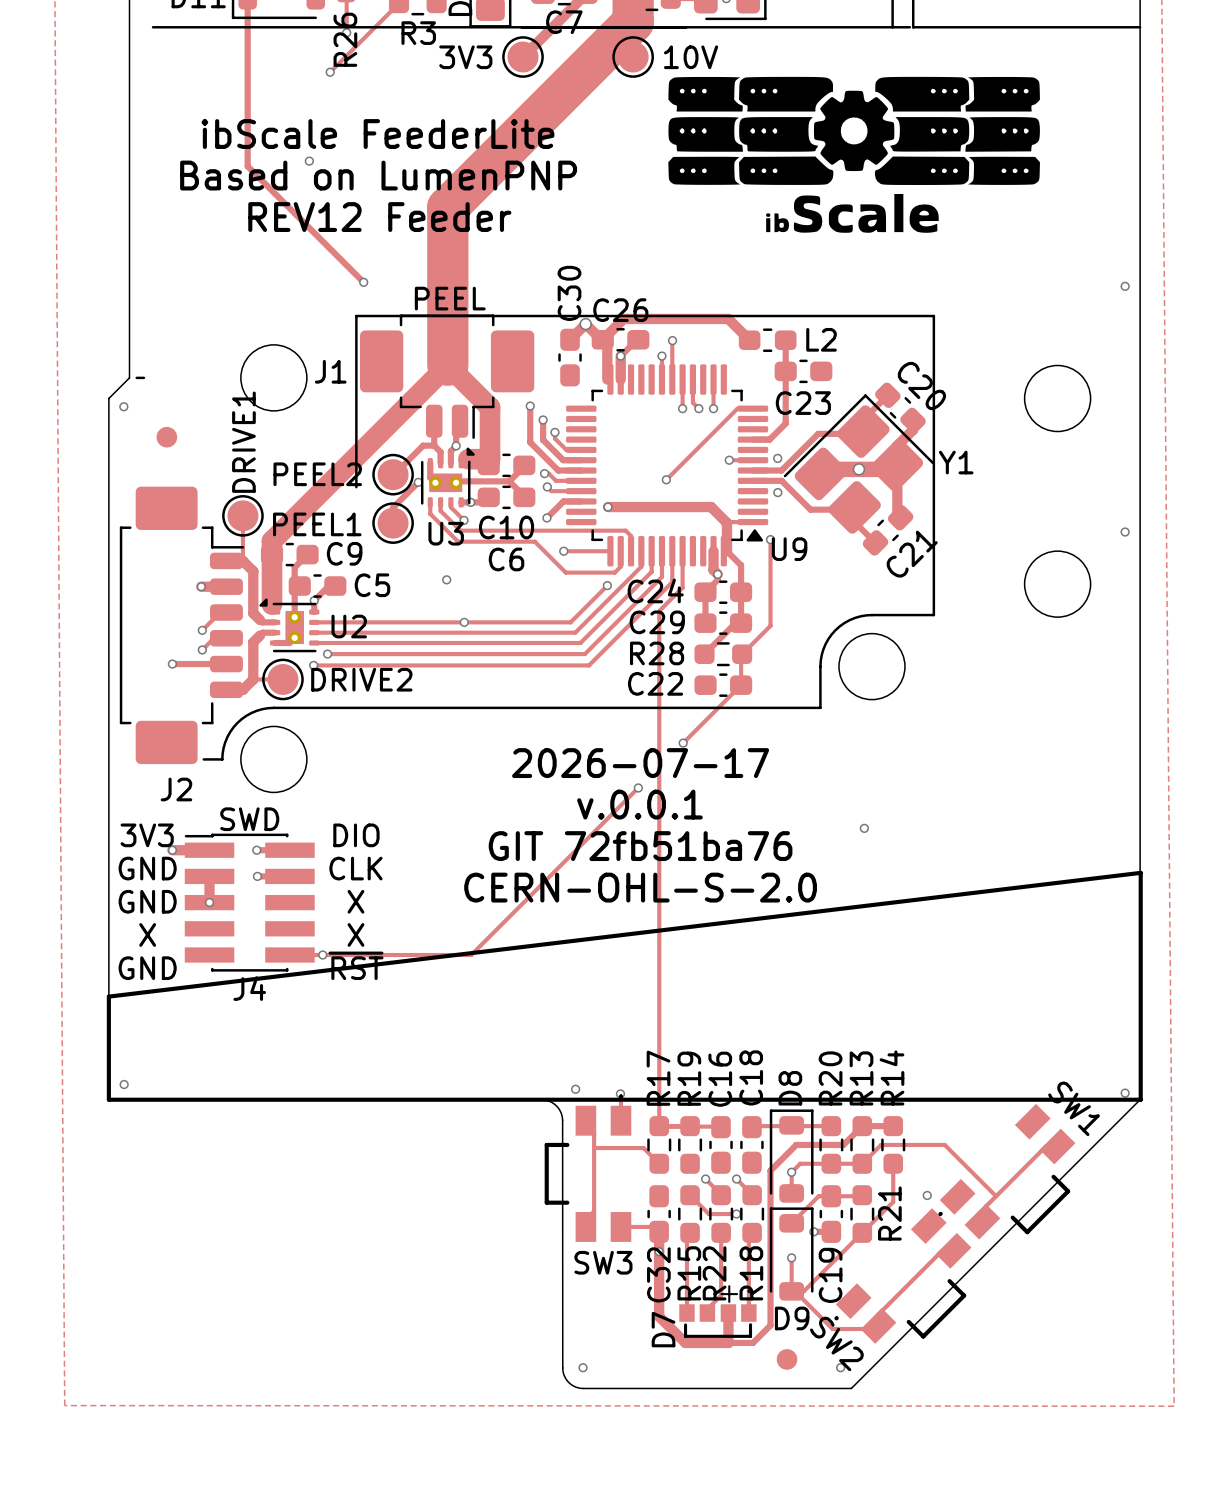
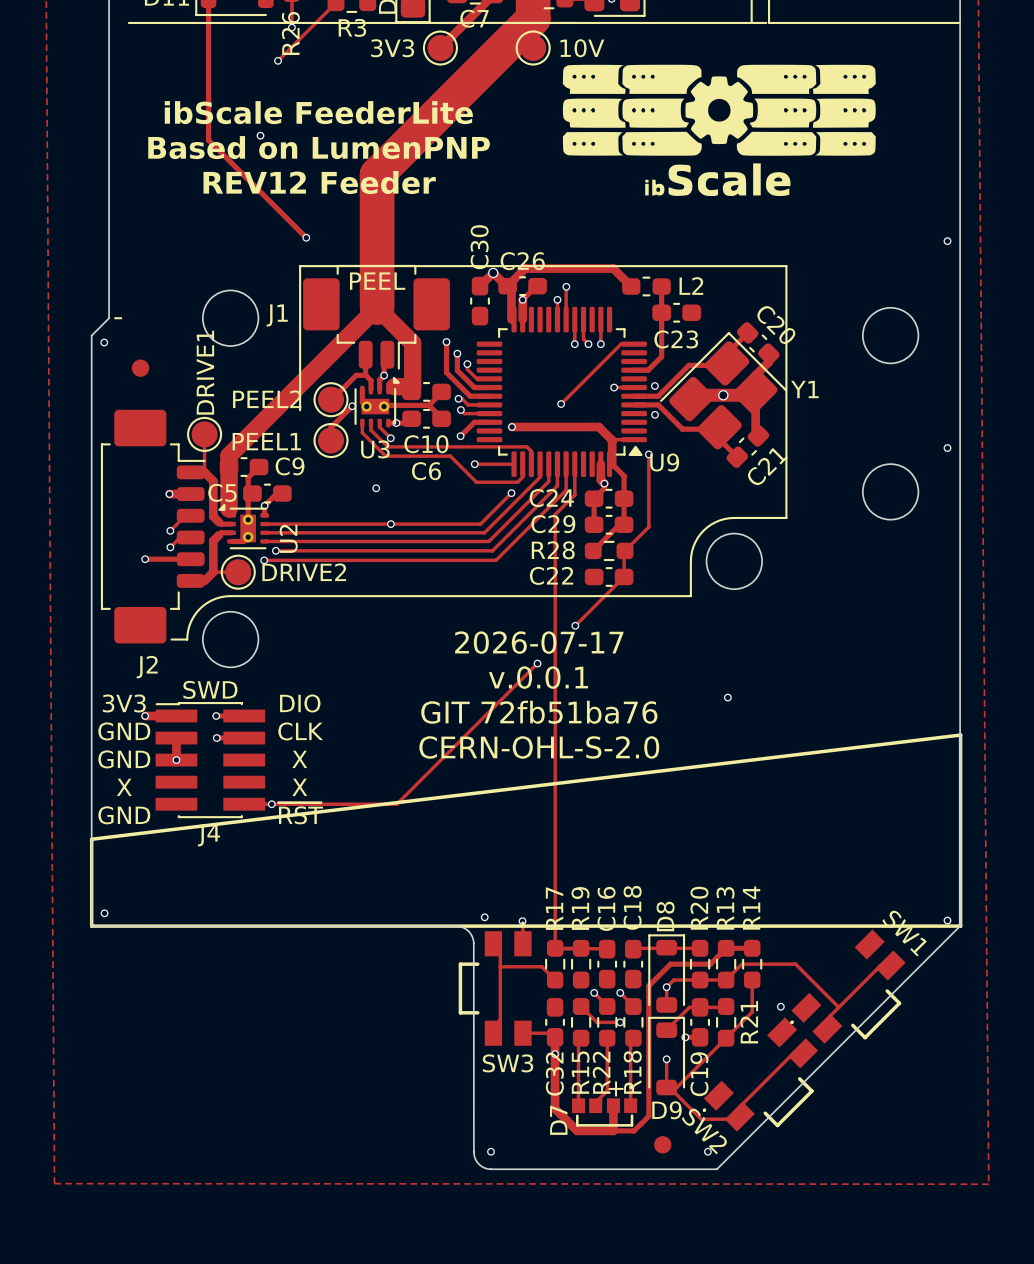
text position: PEEL (450, 298) -> PEEL (377, 281)
C5 name position: C5 (372, 585) -> C5 (222, 492)
U2 name rotation: 0° (349, 626) -> 90° counterclockwise (288, 538)

